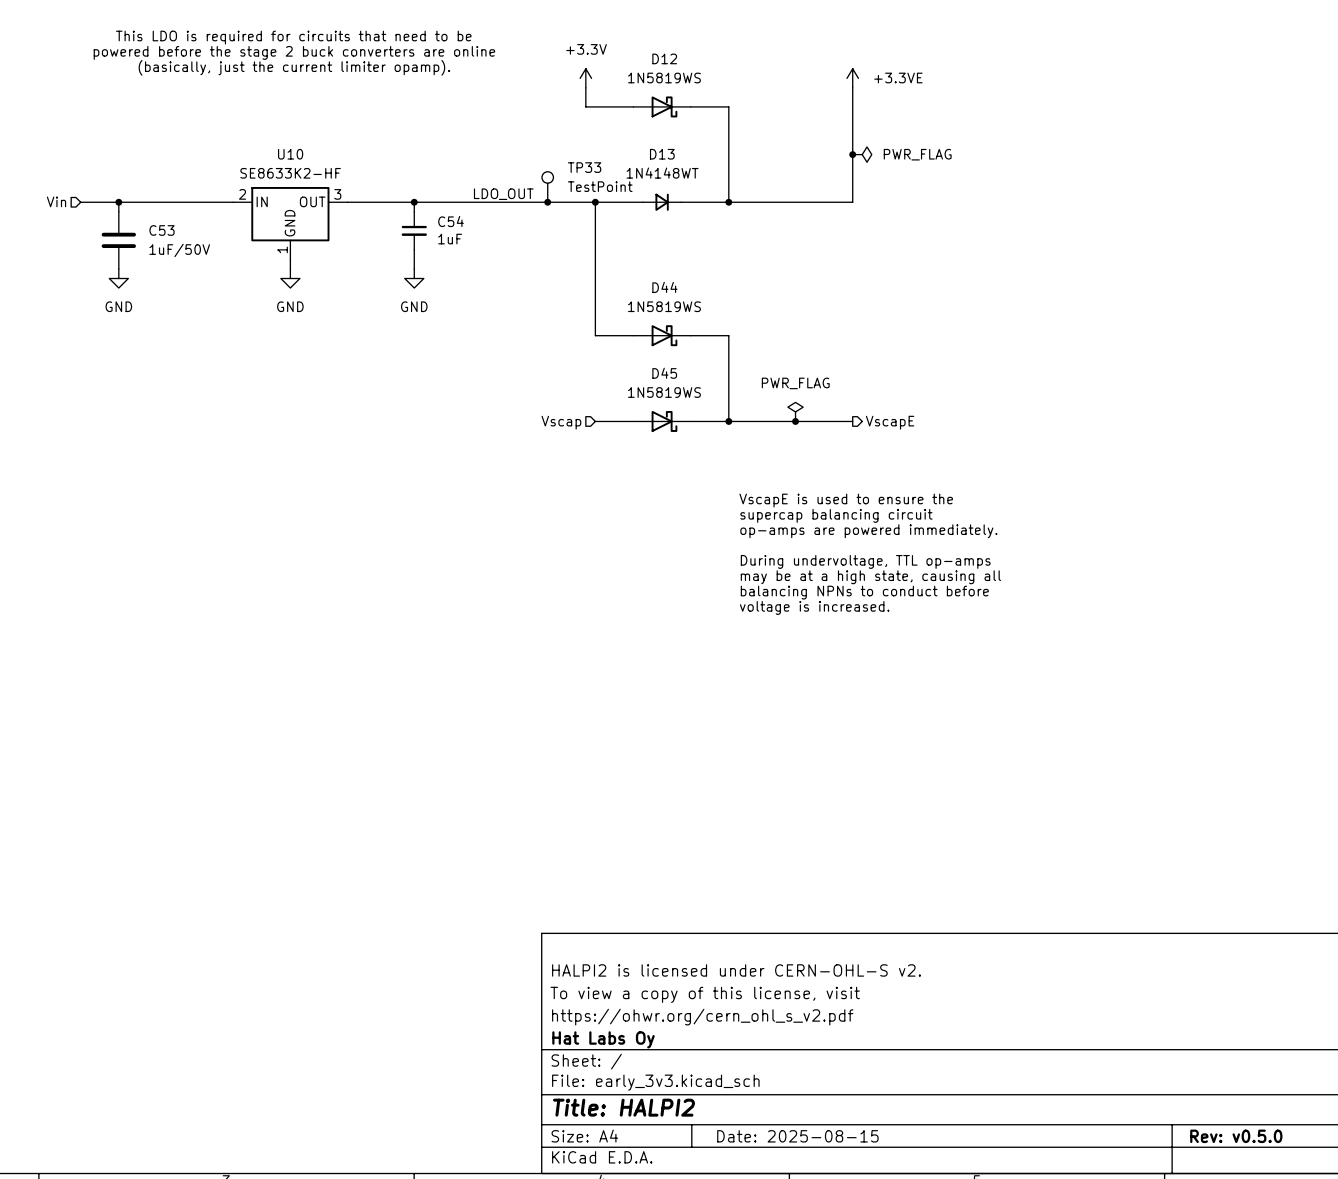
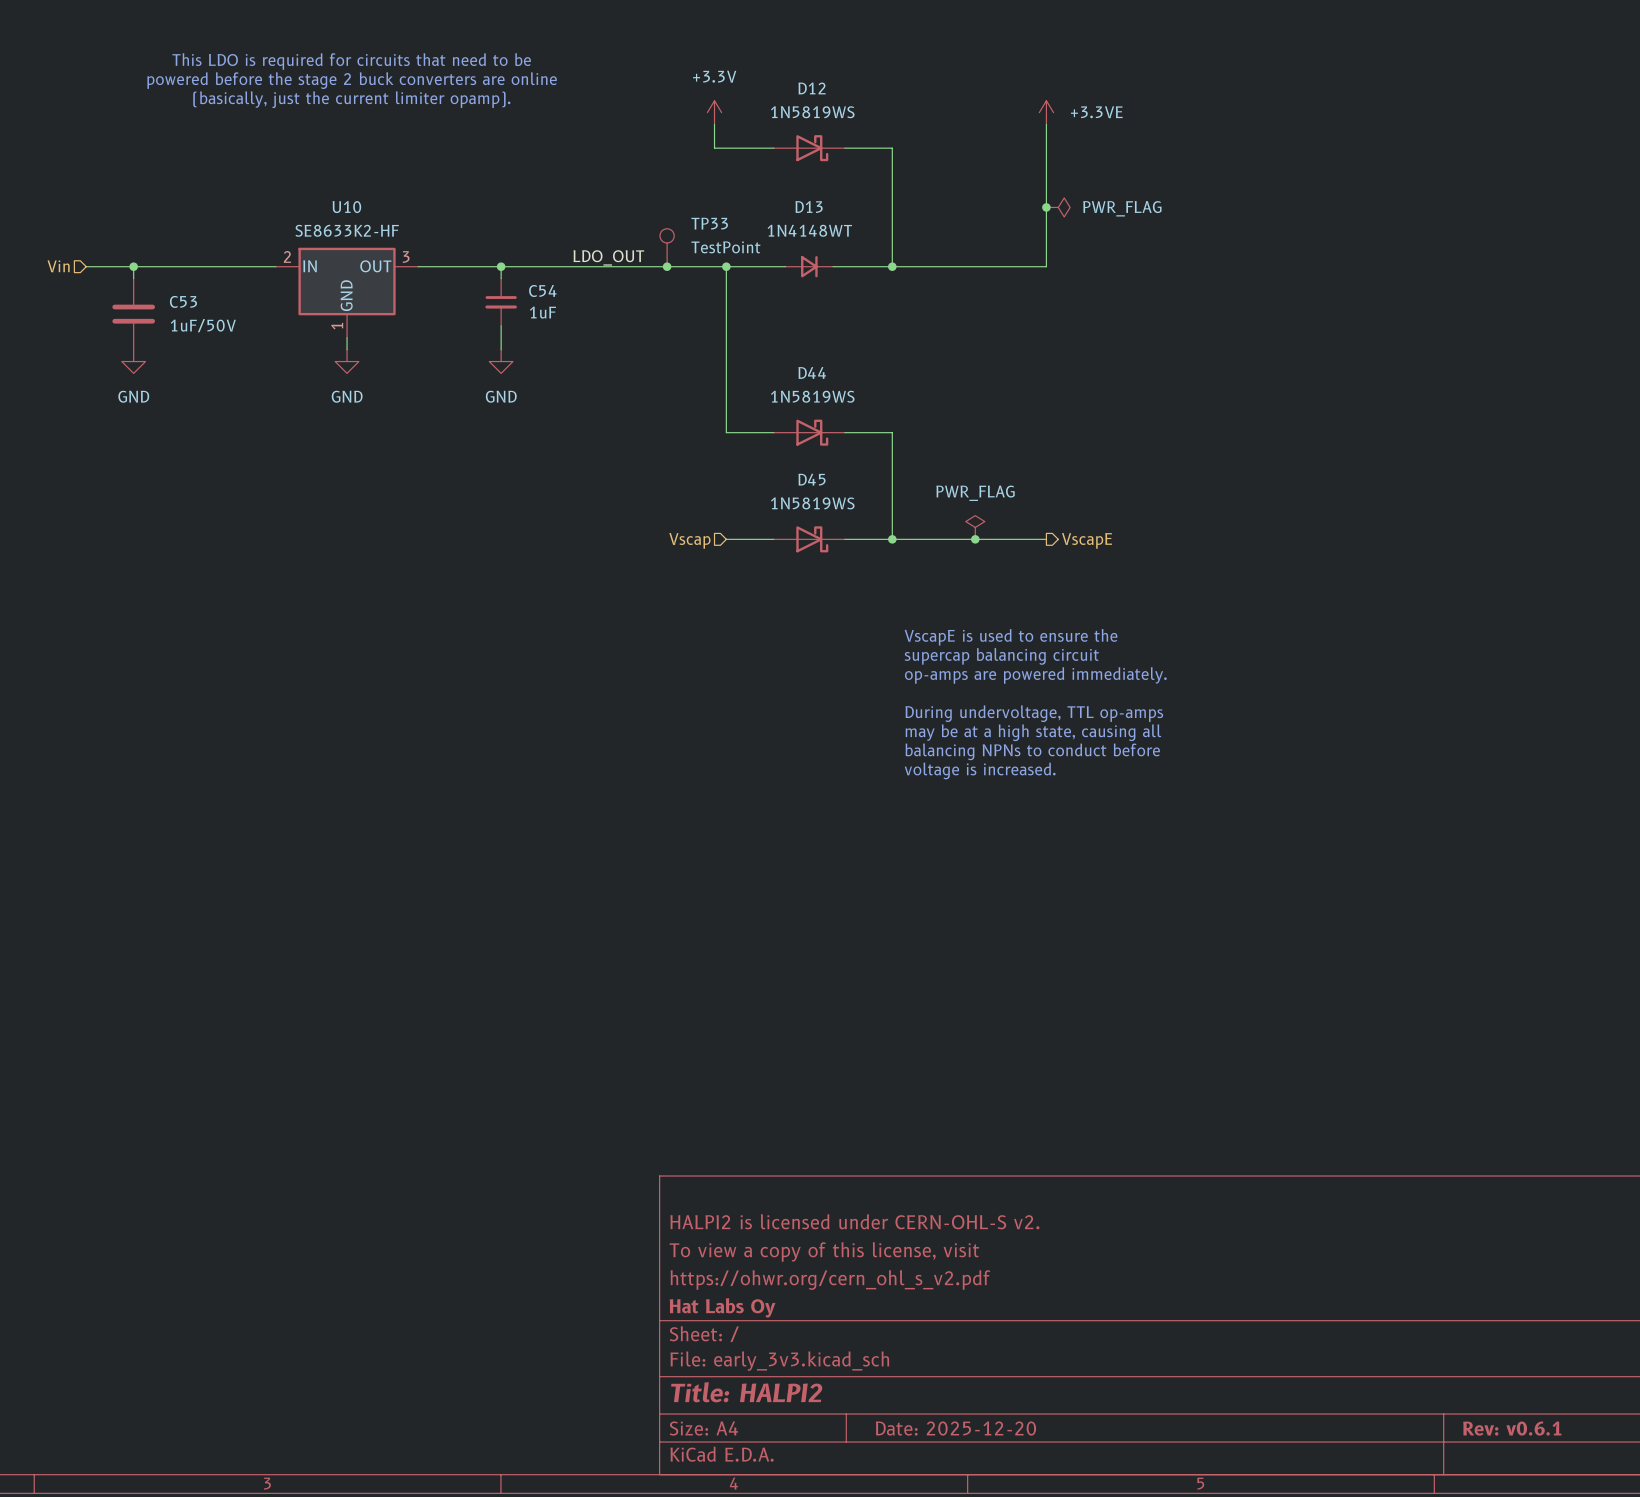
title block: Date: 2025-08-15 (797, 1136) -> Date: 2025-12-20 (955, 1428)
title block: Rev: v0.5.0 (1236, 1136) -> Rev: v0.6.1 (1512, 1428)

